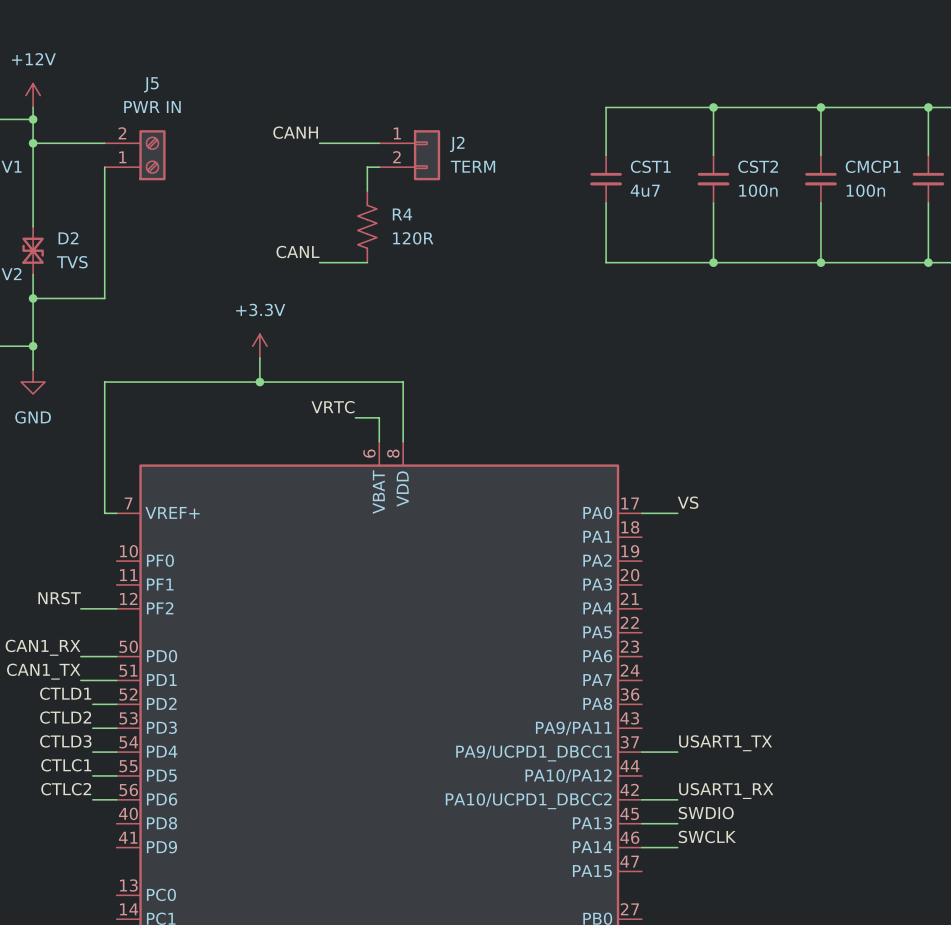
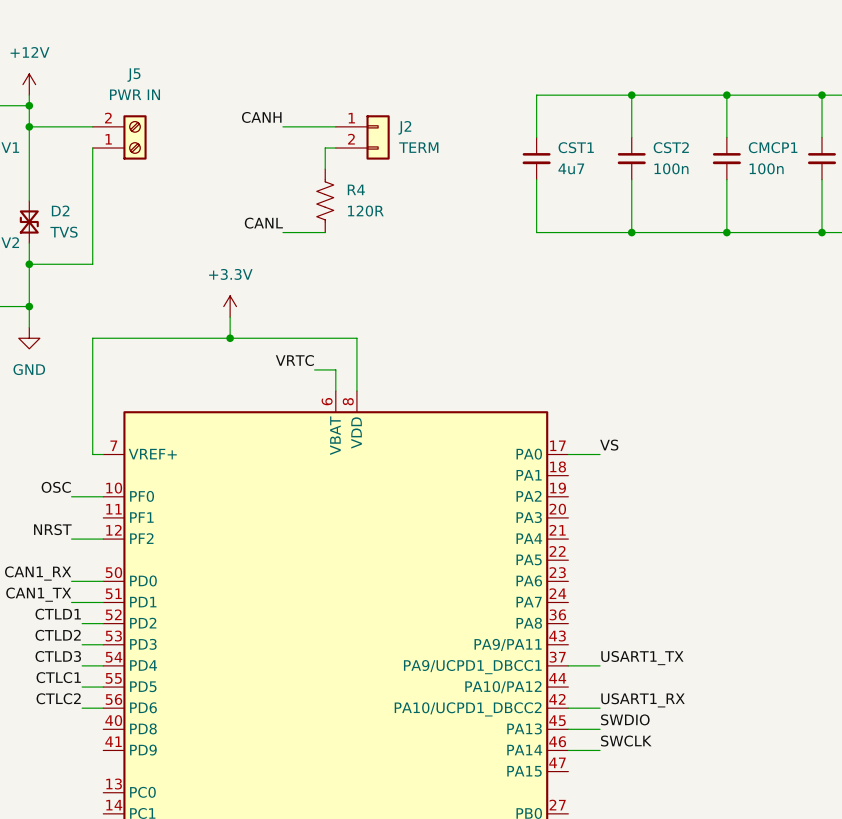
label: none -> OSC (56, 487)
wire: none -> (71, 496) (103, 496)

